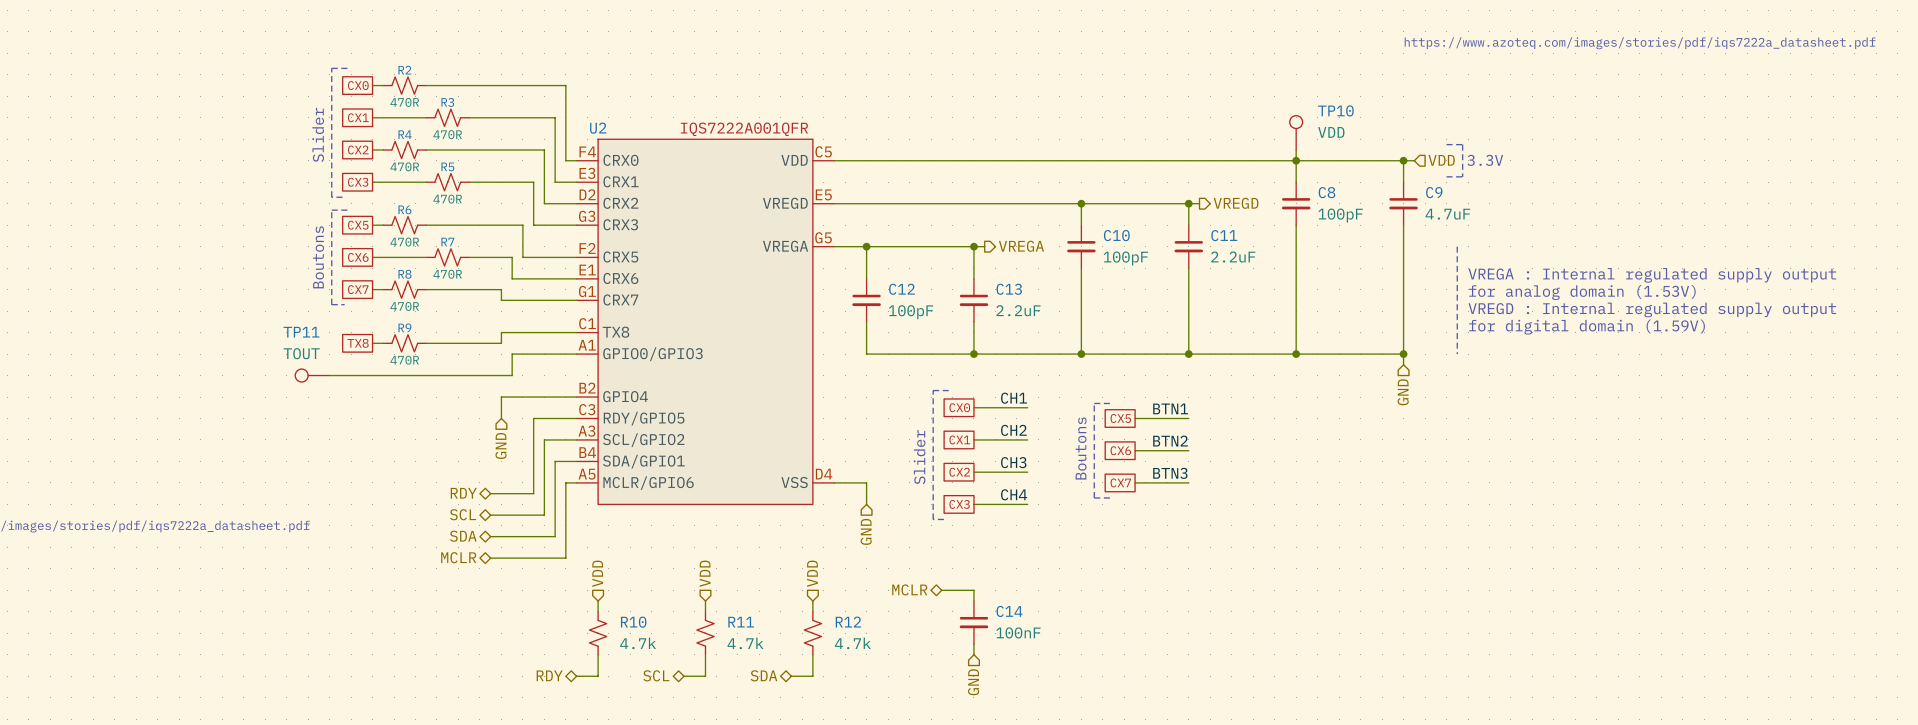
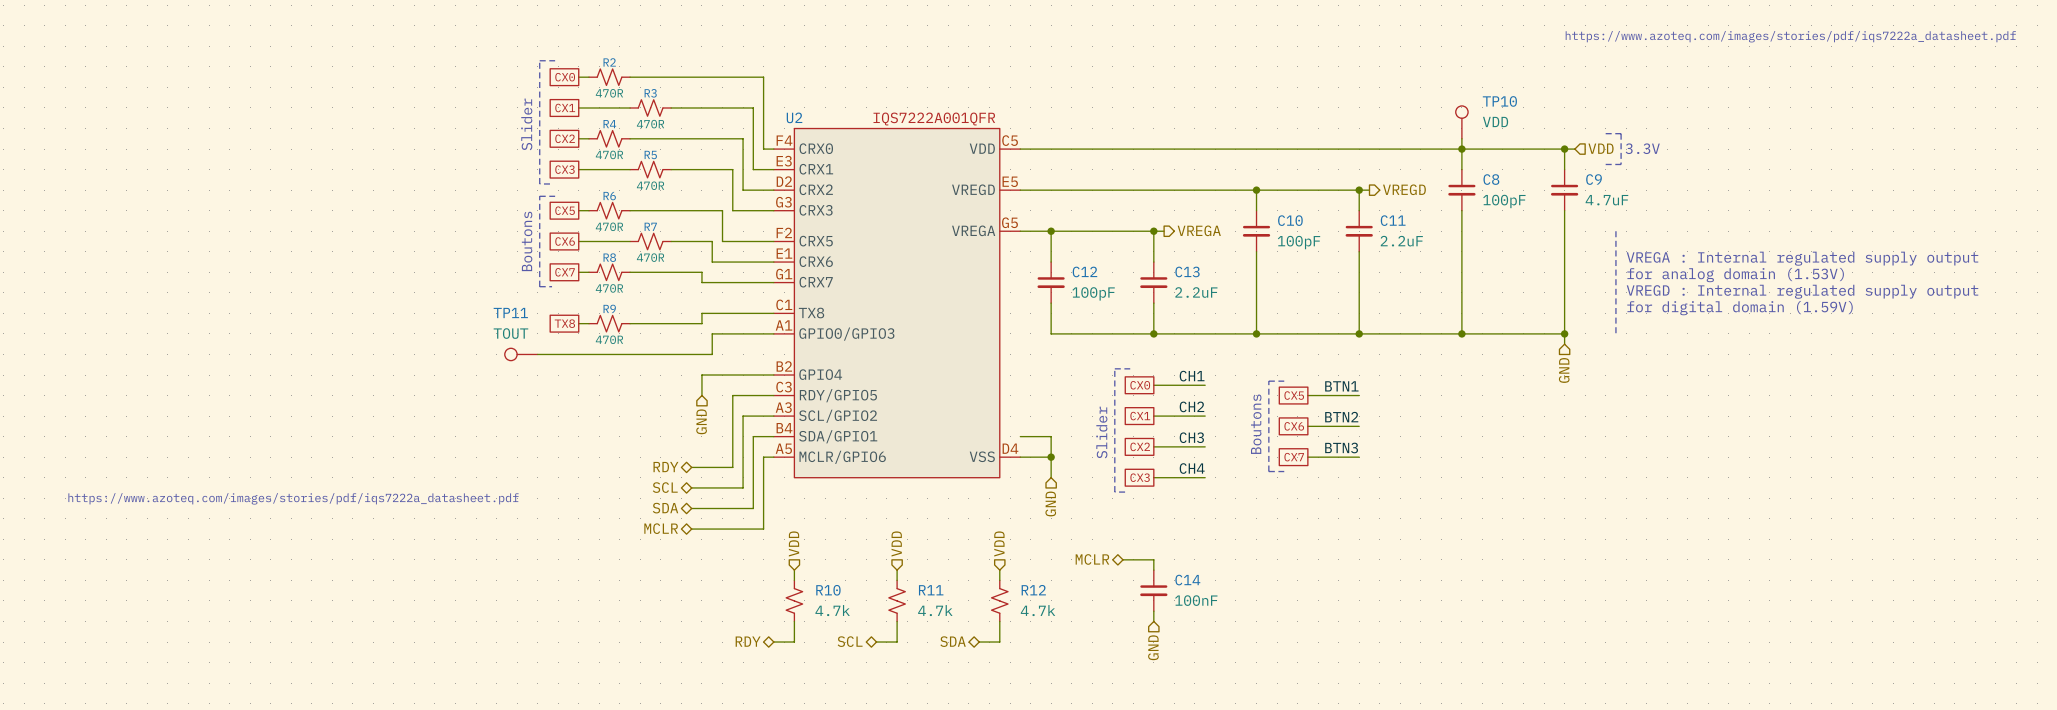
wire: none -> (1020, 436) (1051, 436) (1051, 457)
junction: none -> (1051, 457)

